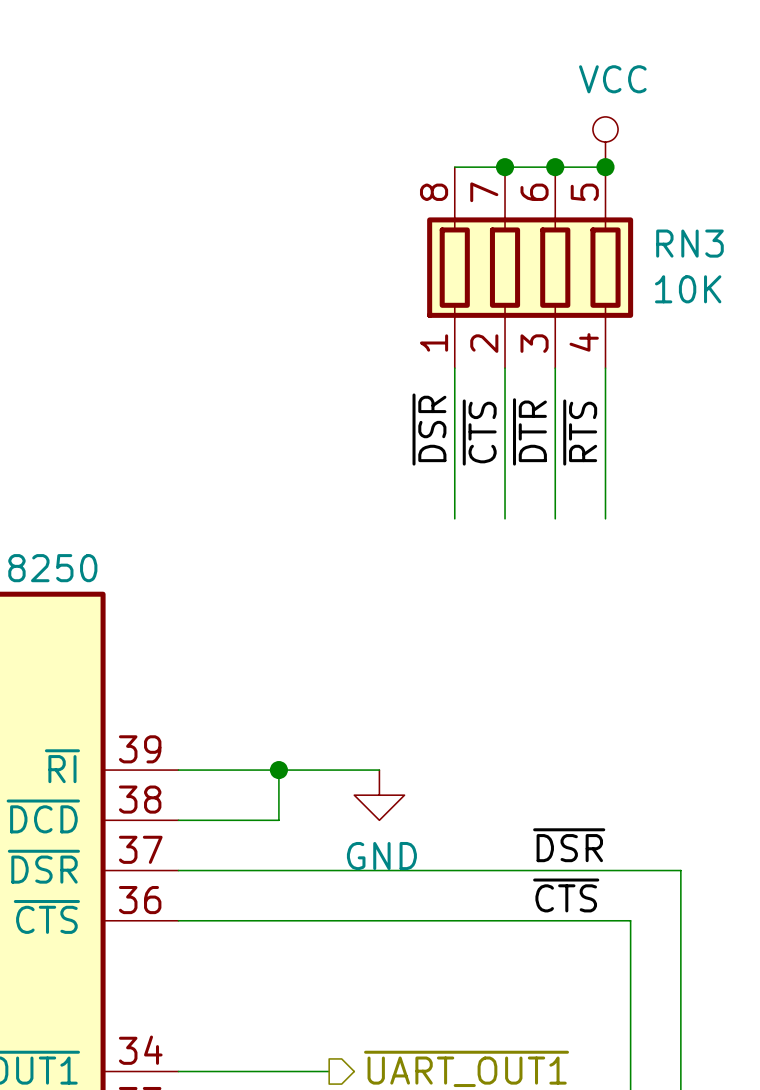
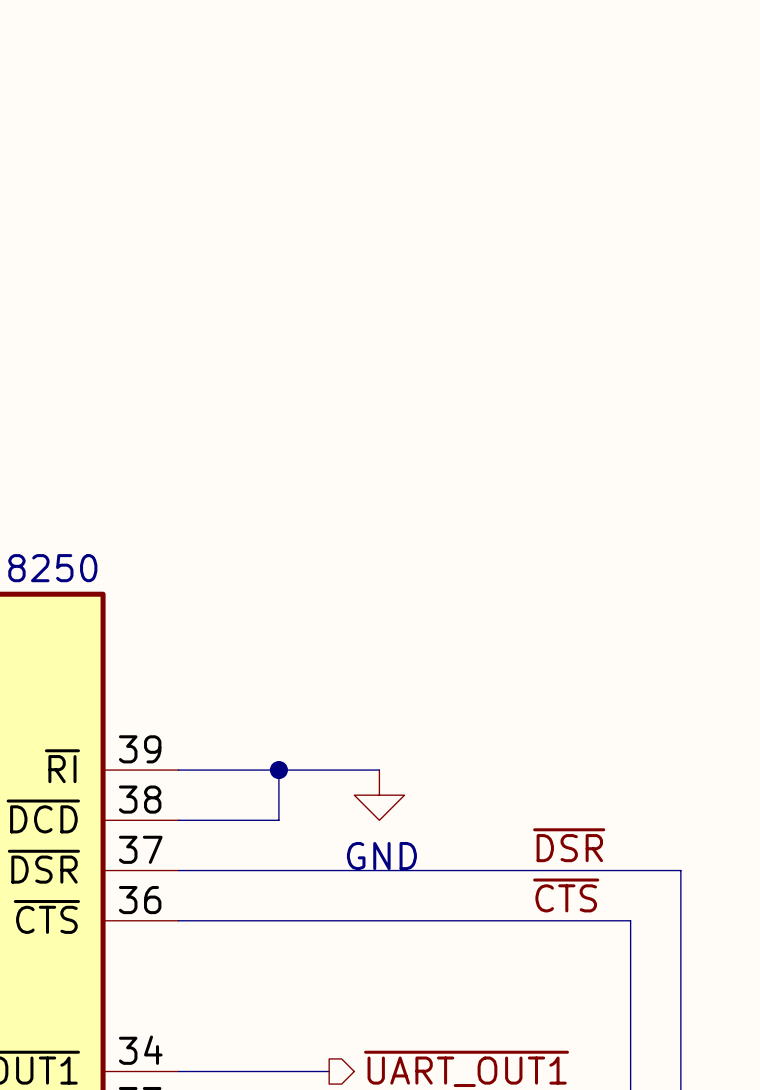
power symbol: VCC (605, 142) -> none
wire: (454, 167) (605, 167) -> none
junction: (505, 167) -> none
junction: (555, 167) -> none
junction: (605, 167) -> none
RN3: 10K (530, 267) -> none
wire: (454, 368) (454, 518) -> none
wire: (505, 368) (505, 518) -> none
wire: (555, 368) (555, 518) -> none
wire: (605, 368) (605, 518) -> none
label: ~{DSR} (429, 429) -> none
label: ~{DTR} (529, 431) -> none
label: ~{CTS} (479, 432) -> none
label: ~{RTS} (580, 432) -> none

